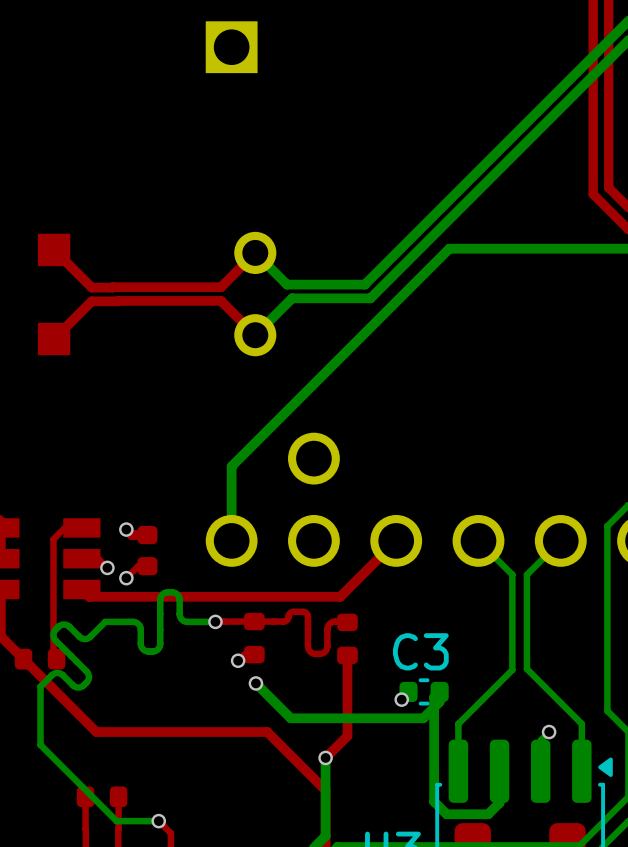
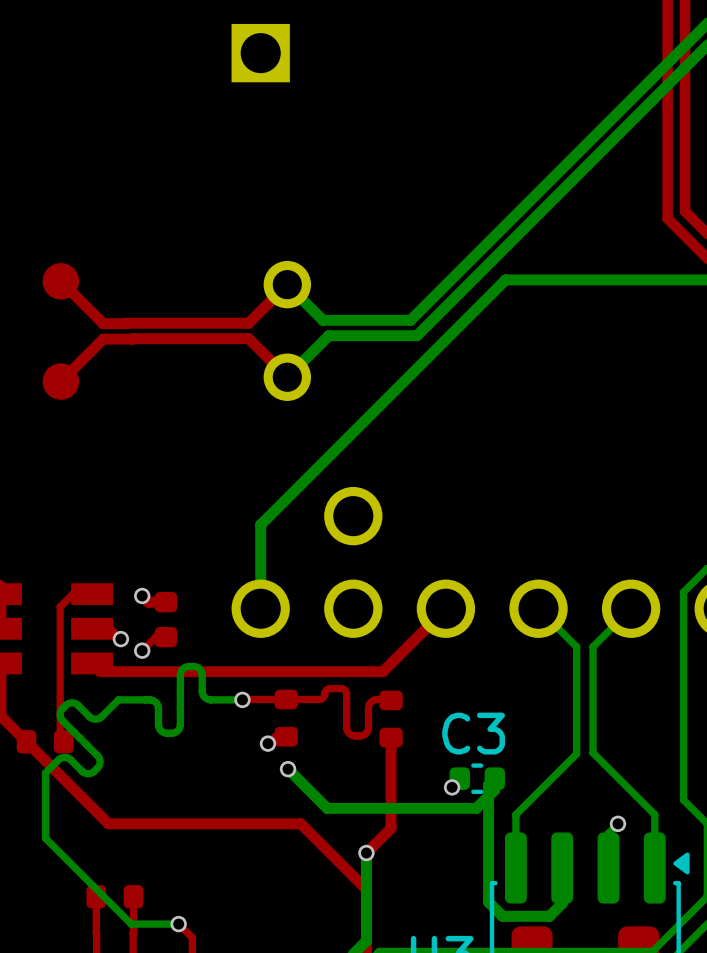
part footprint: [37, 233, 71, 267] -> [42, 263, 80, 300]
part footprint: [37, 322, 71, 356] -> [42, 363, 80, 400]

